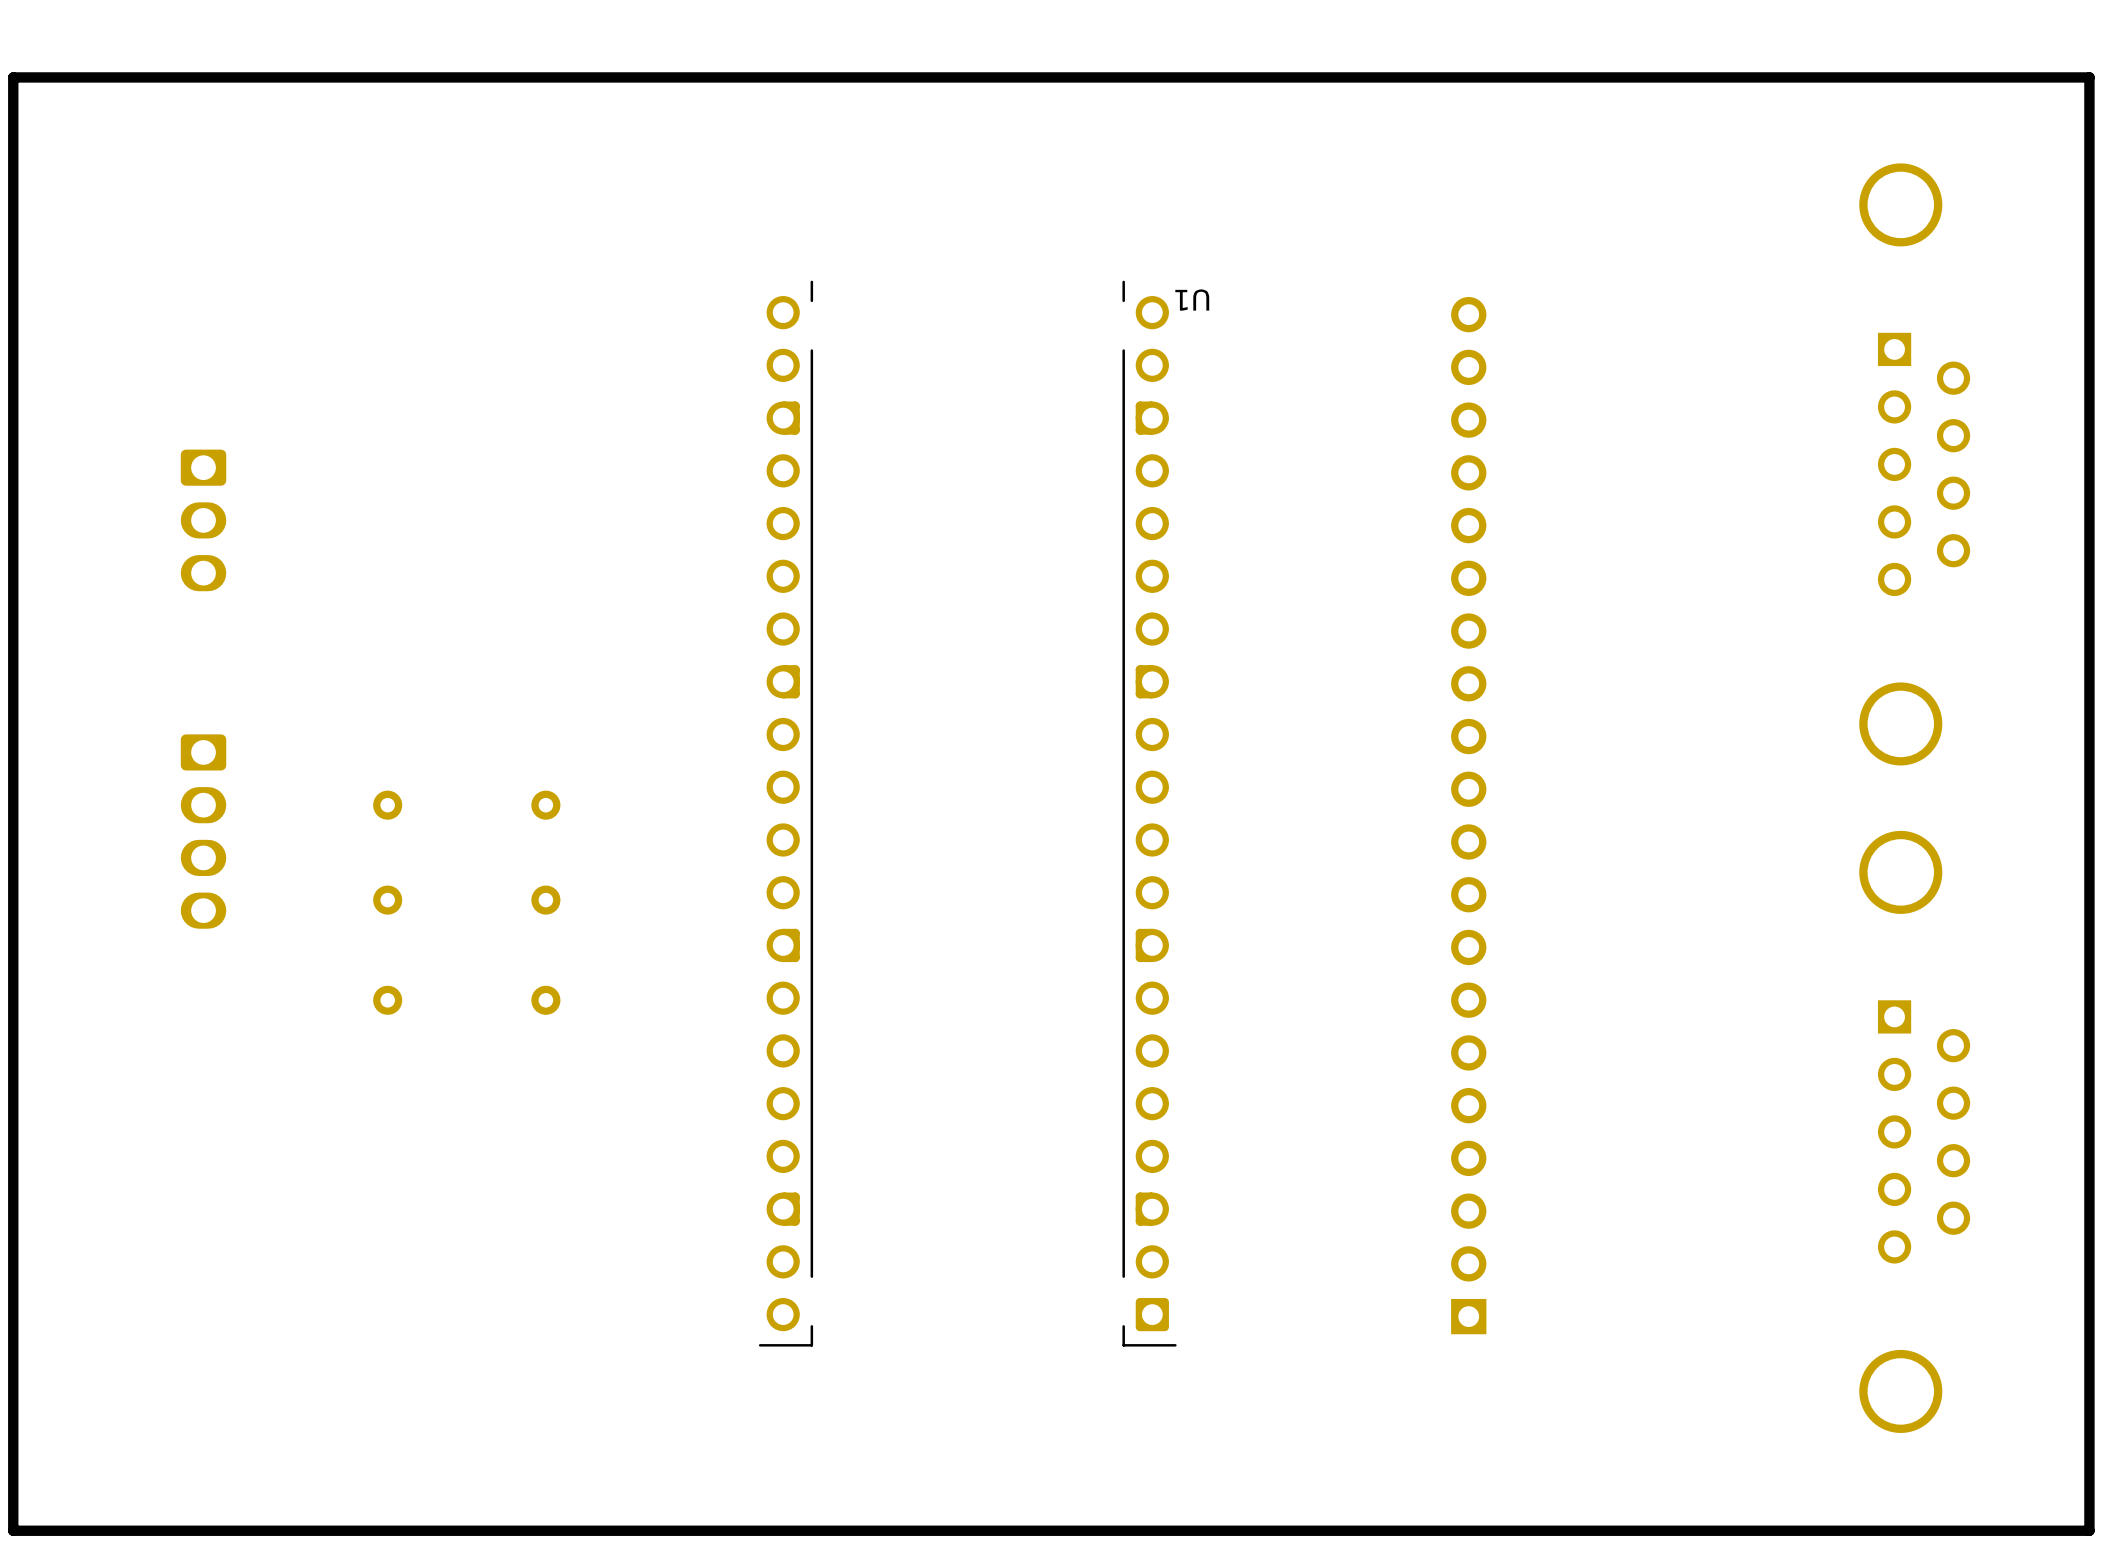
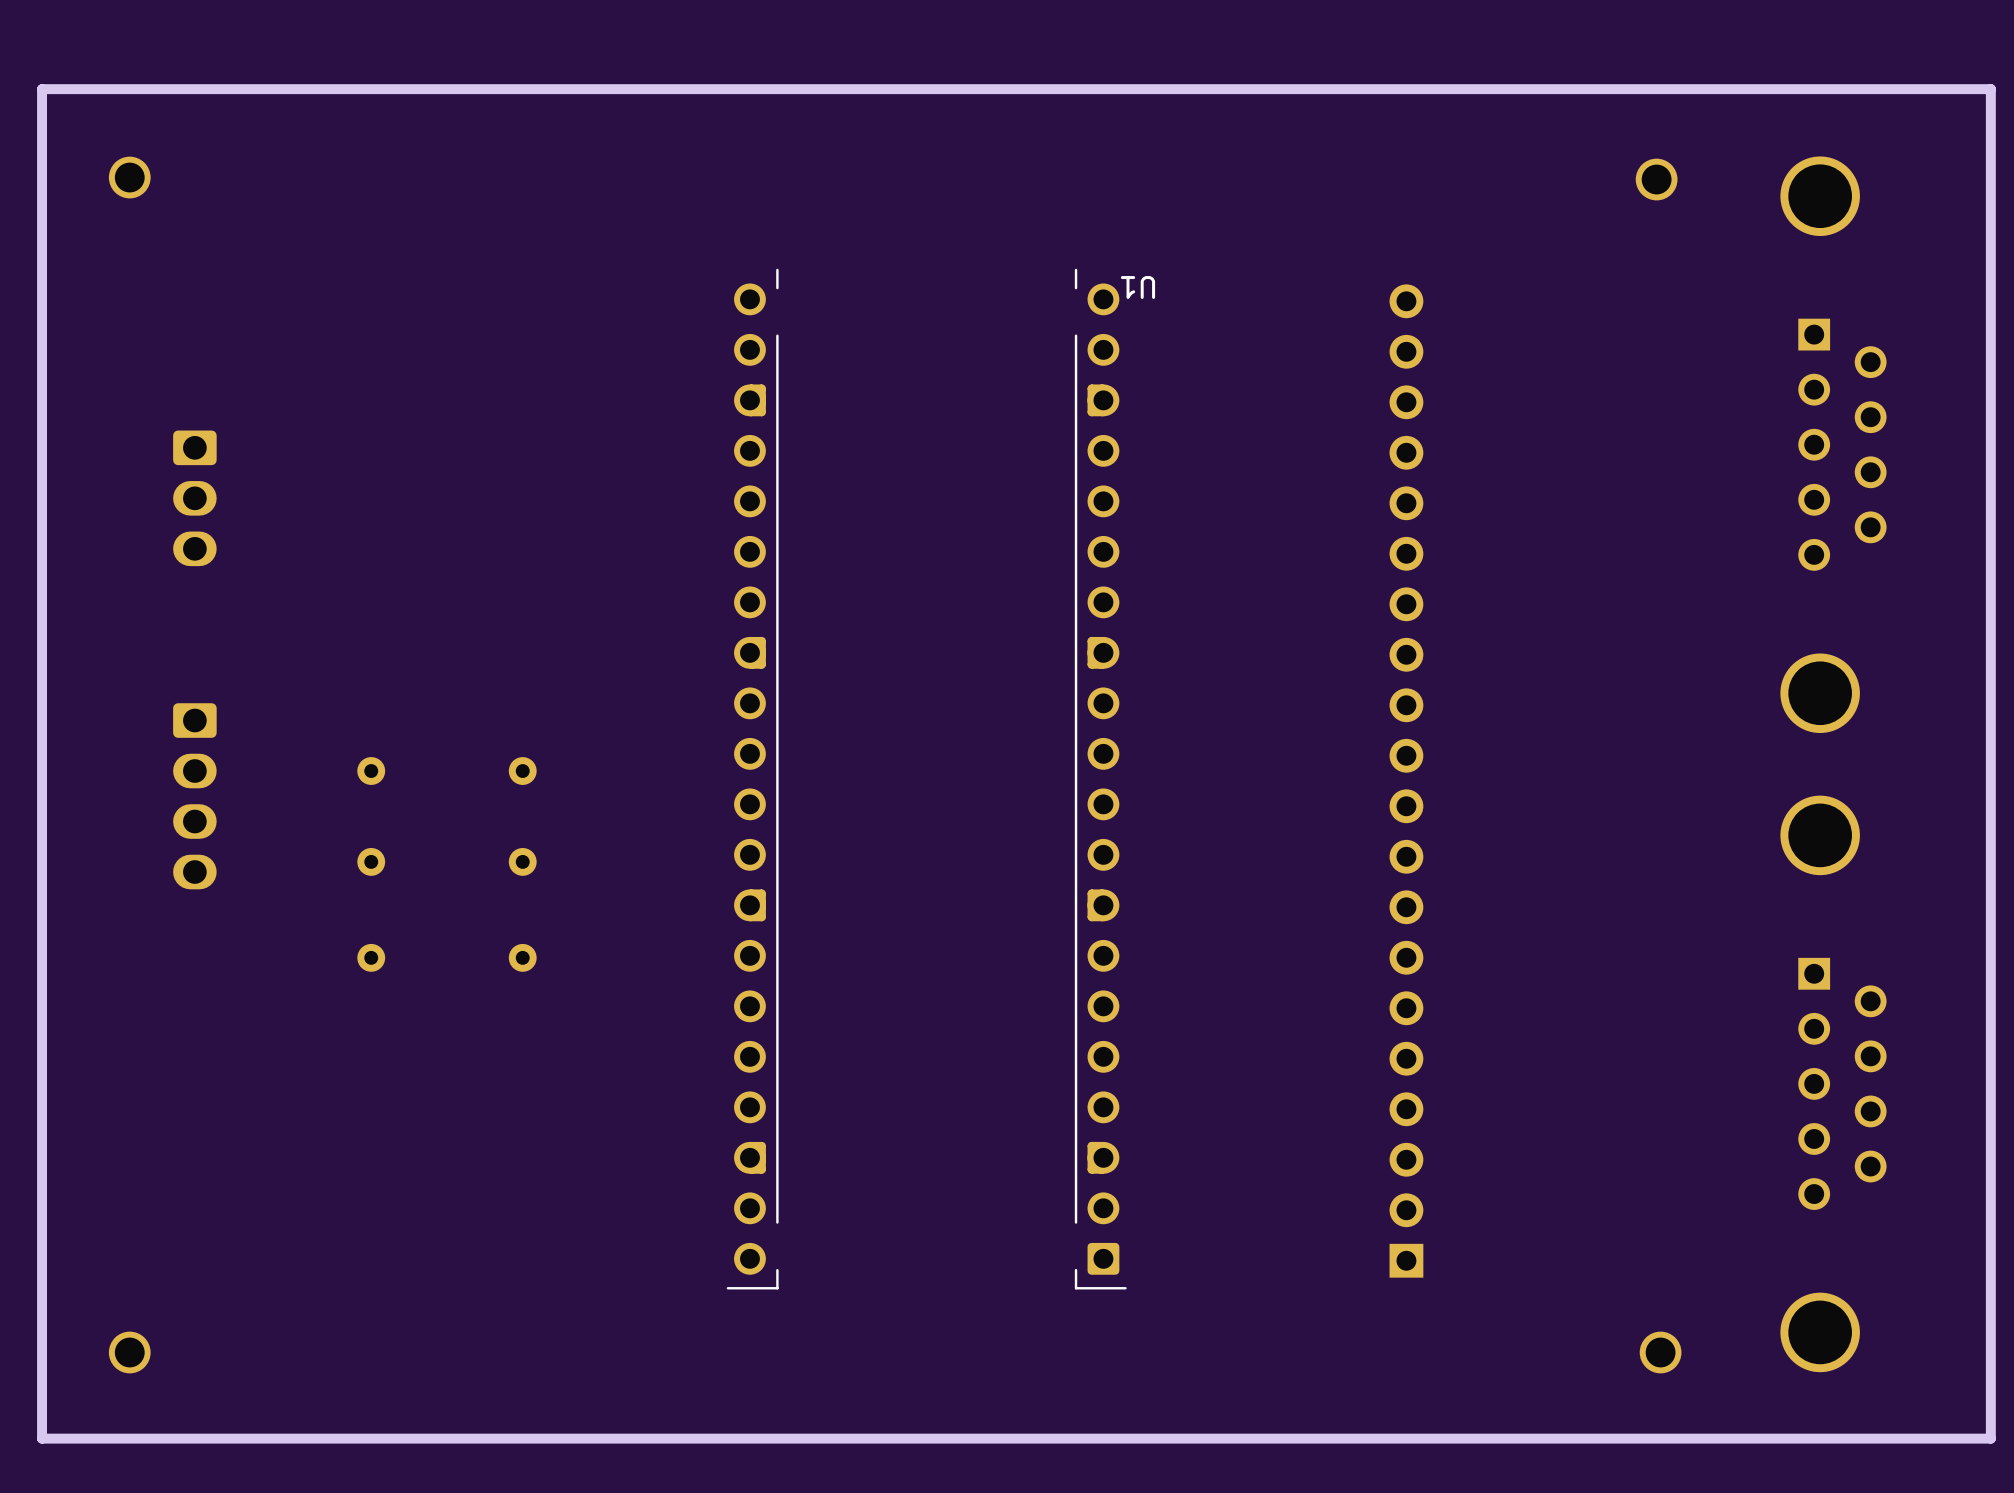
board edge: (2089, 77) (13, 77) (13, 1530) (2089, 1530) (2089, 77) -> (1990, 89) (1990, 1438) (42, 1438) (42, 89) (1990, 89)
part: none -> (129, 177)
part: none -> (1656, 179)
part: none -> (129, 1352)
part: none -> (1660, 1352)

